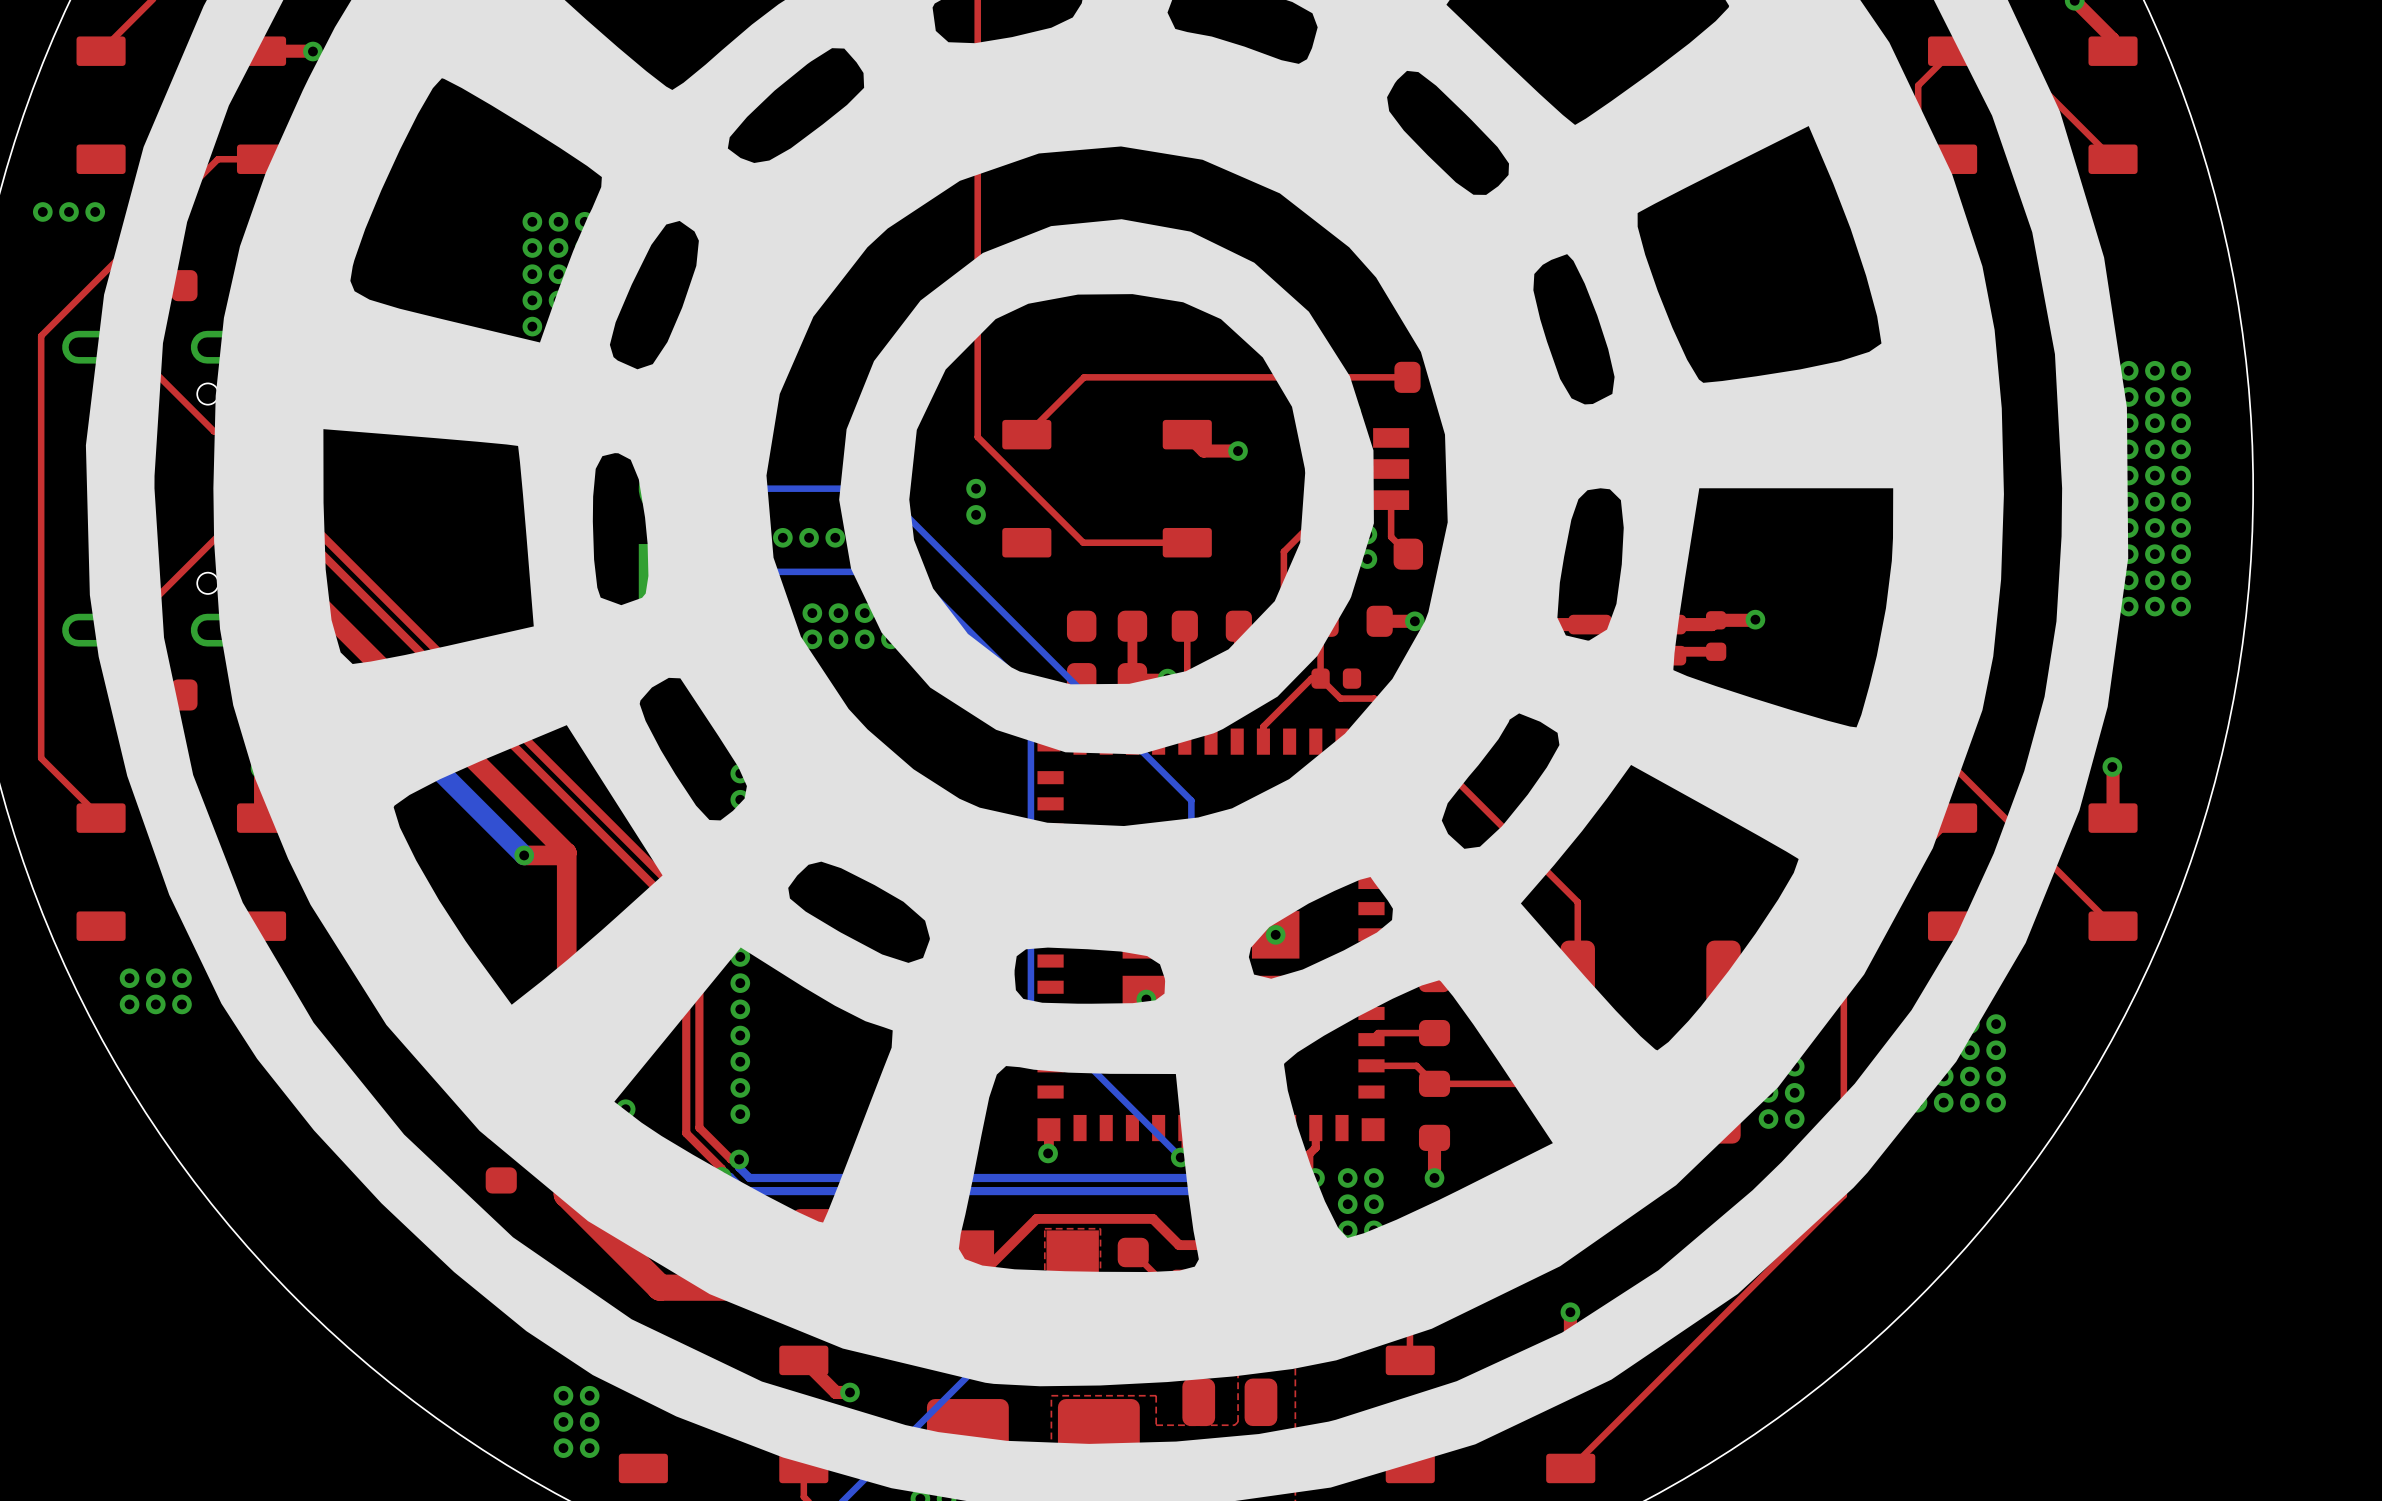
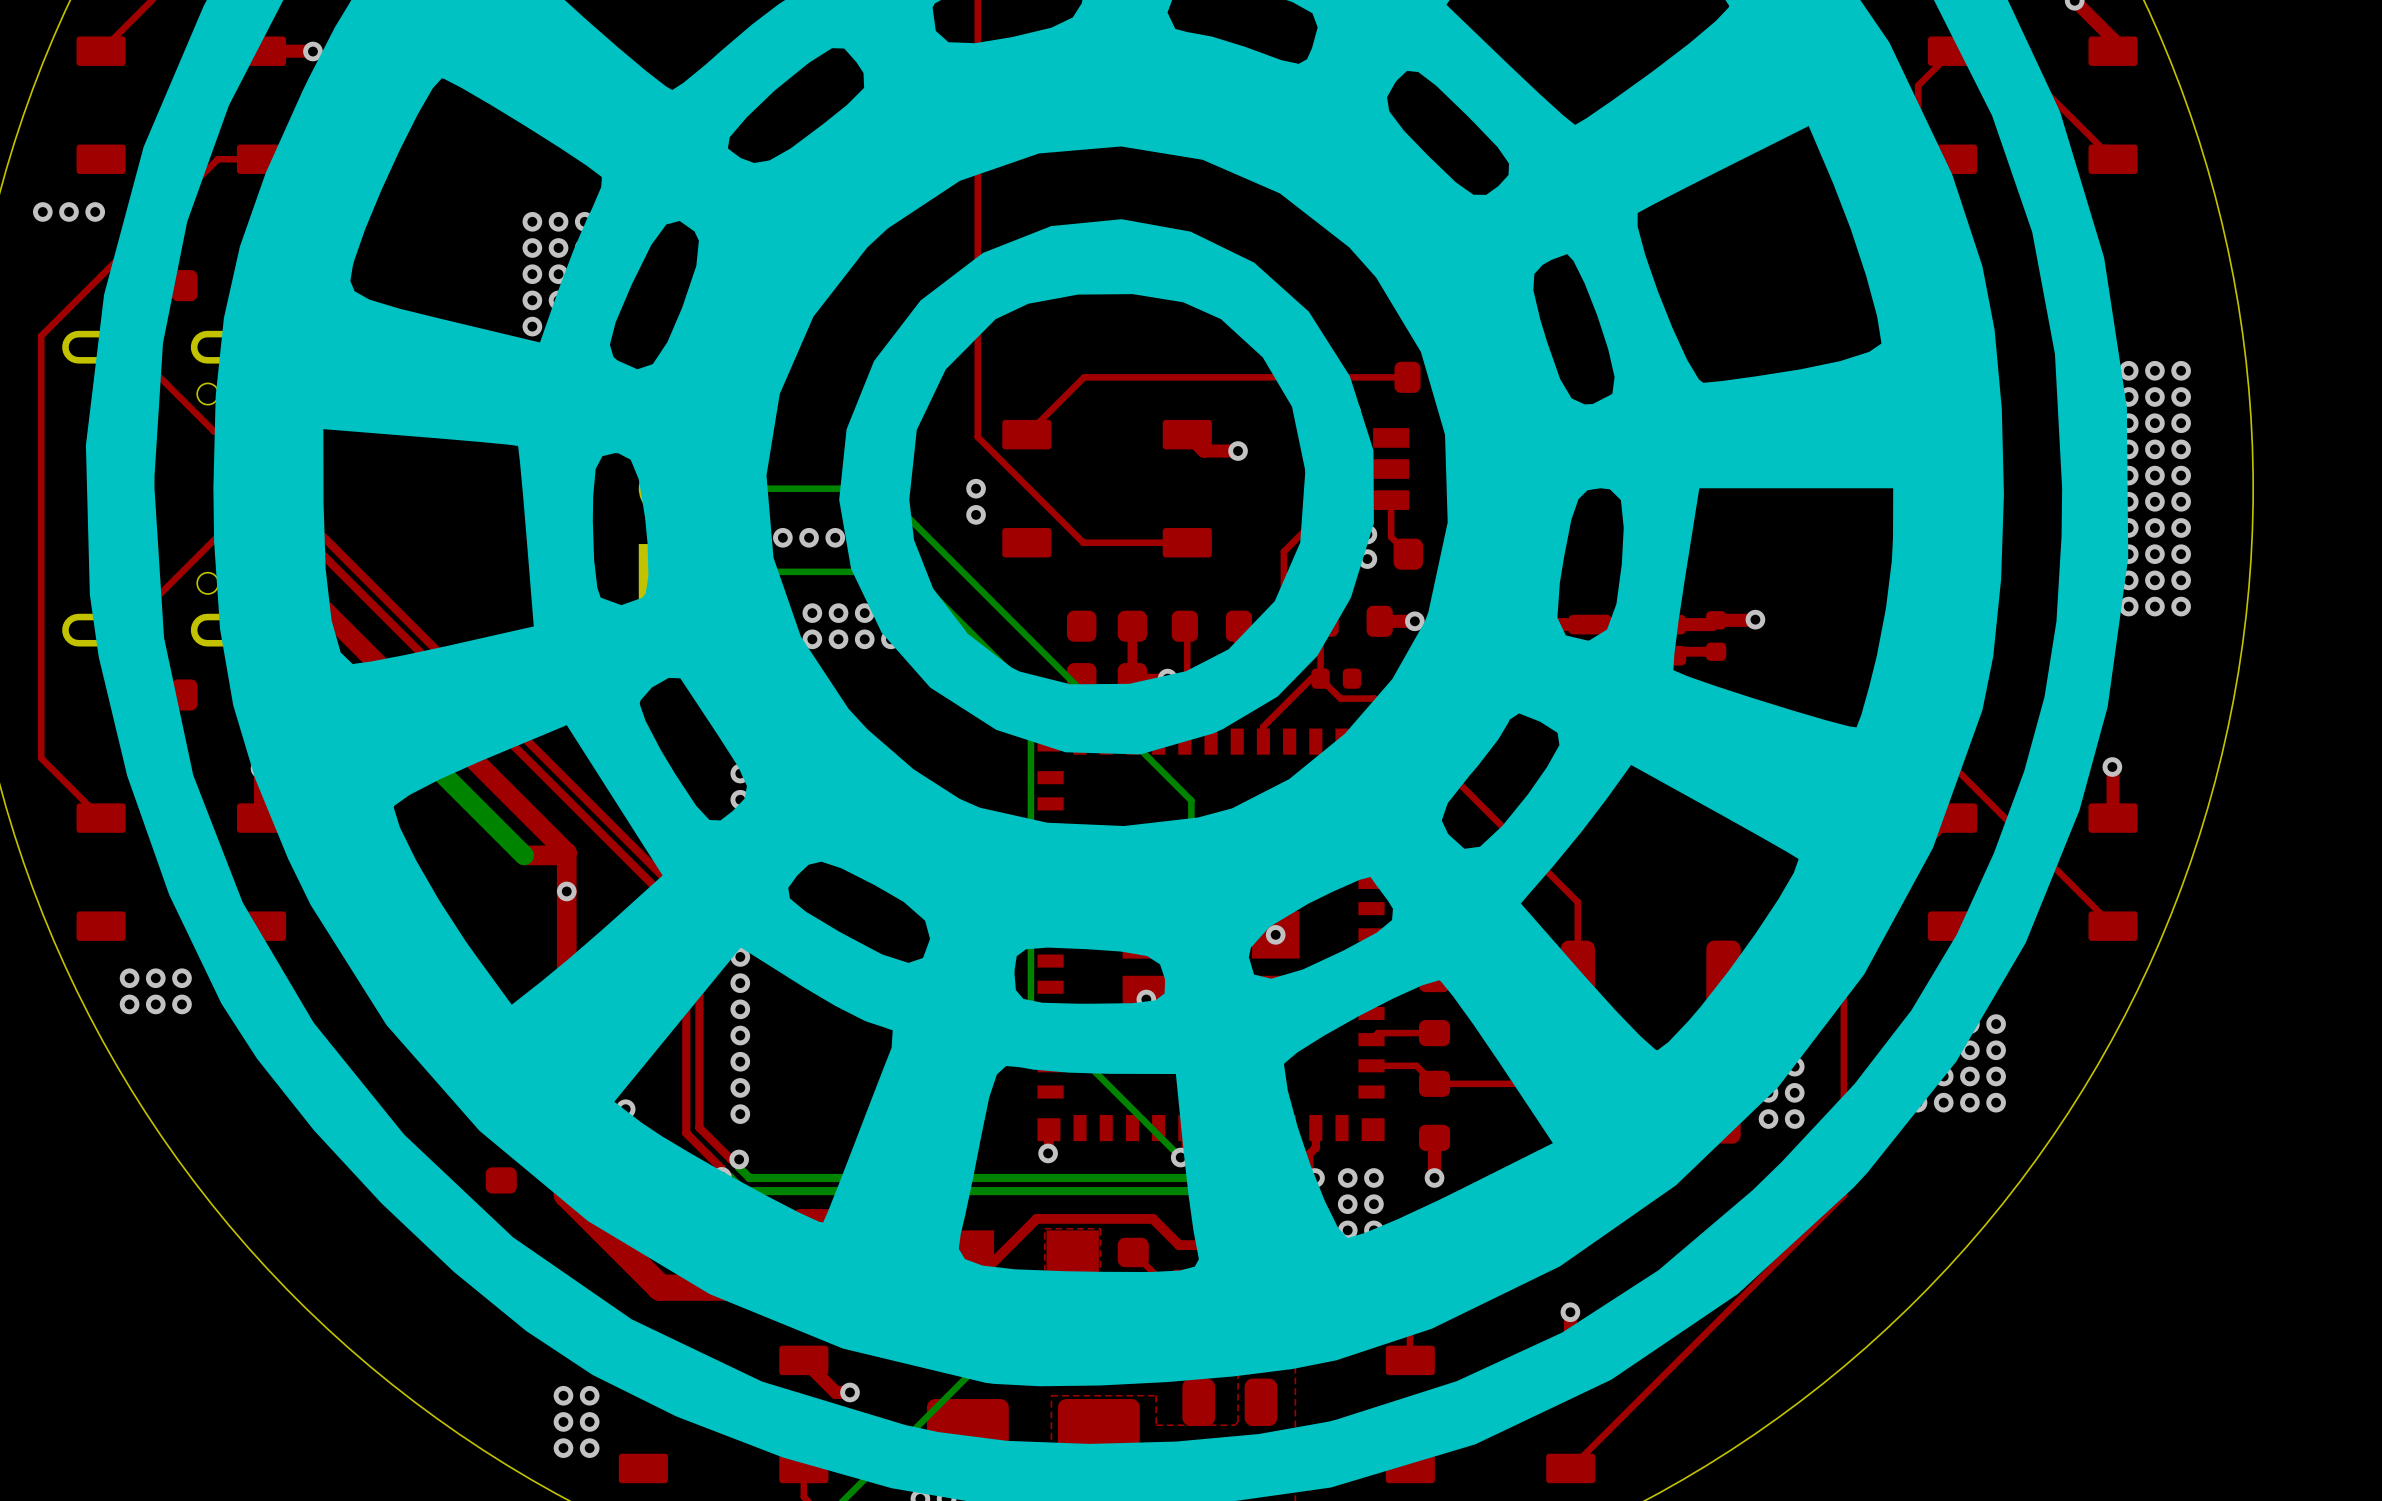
via position: (524, 855) -> (566, 891)

